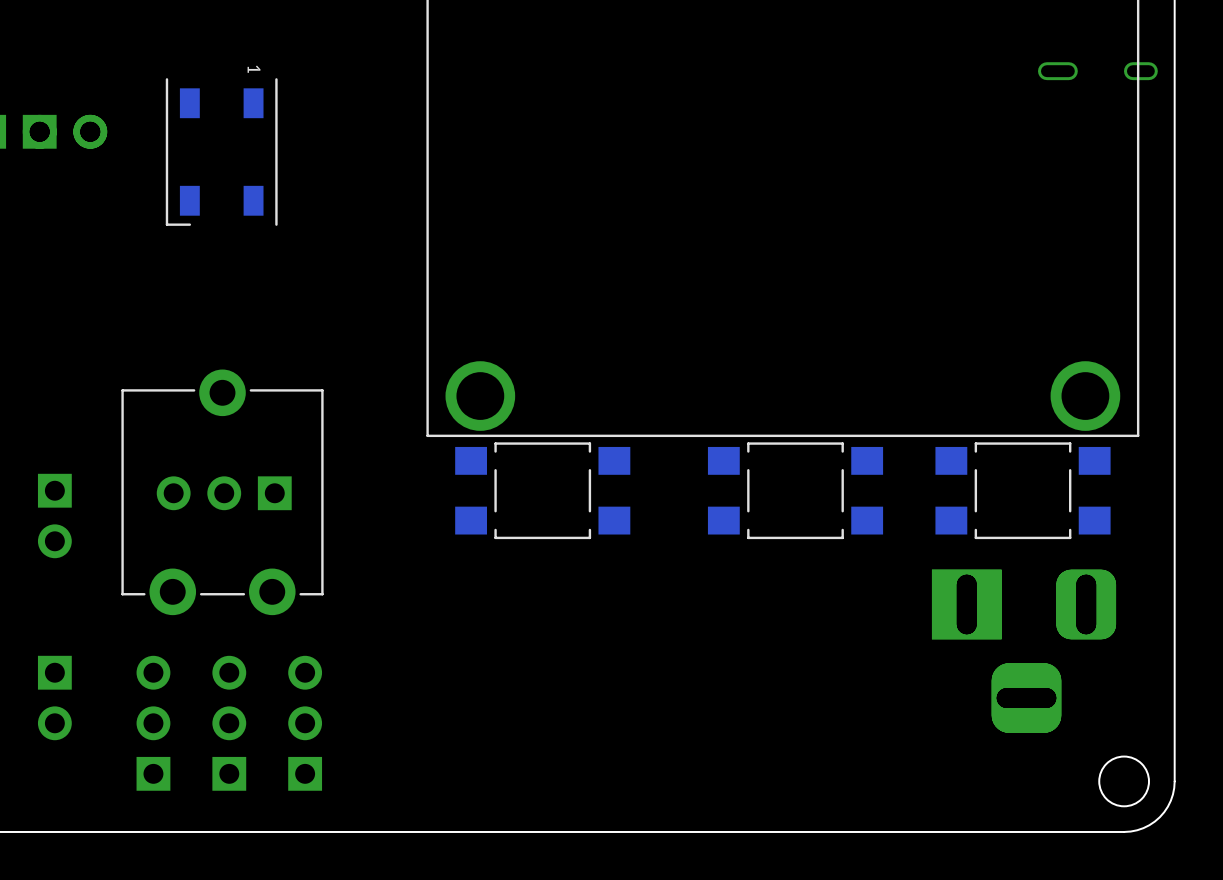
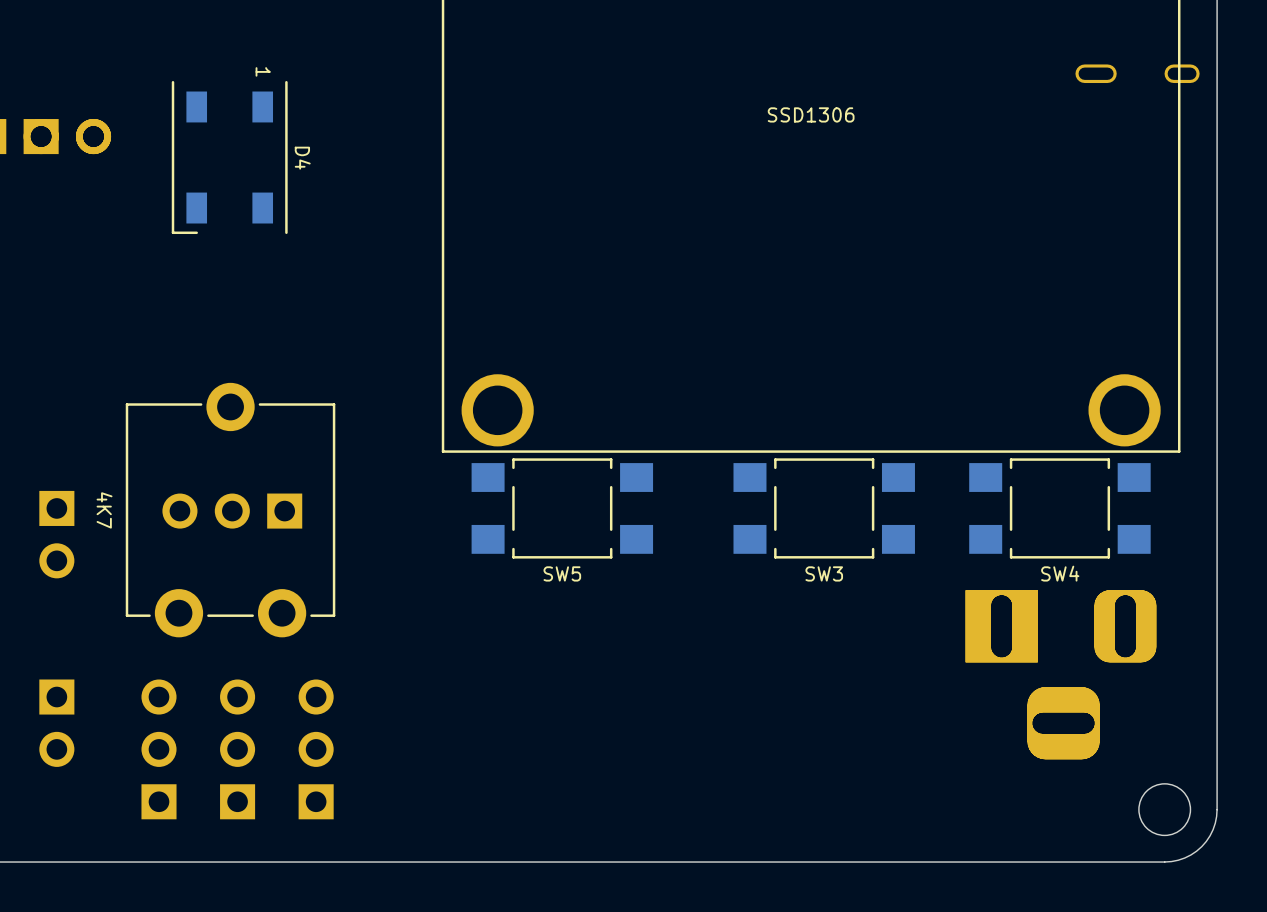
SSD1306 name: none -> SSD1306 (811, 114)
D4 name: none -> D4 (302, 158)
4K7 name: none -> 4K7 (104, 510)
SW5 name: none -> SW5 (562, 573)
SW3 name: none -> SW3 (824, 573)
SW4 name: none -> SW4 (1060, 573)

